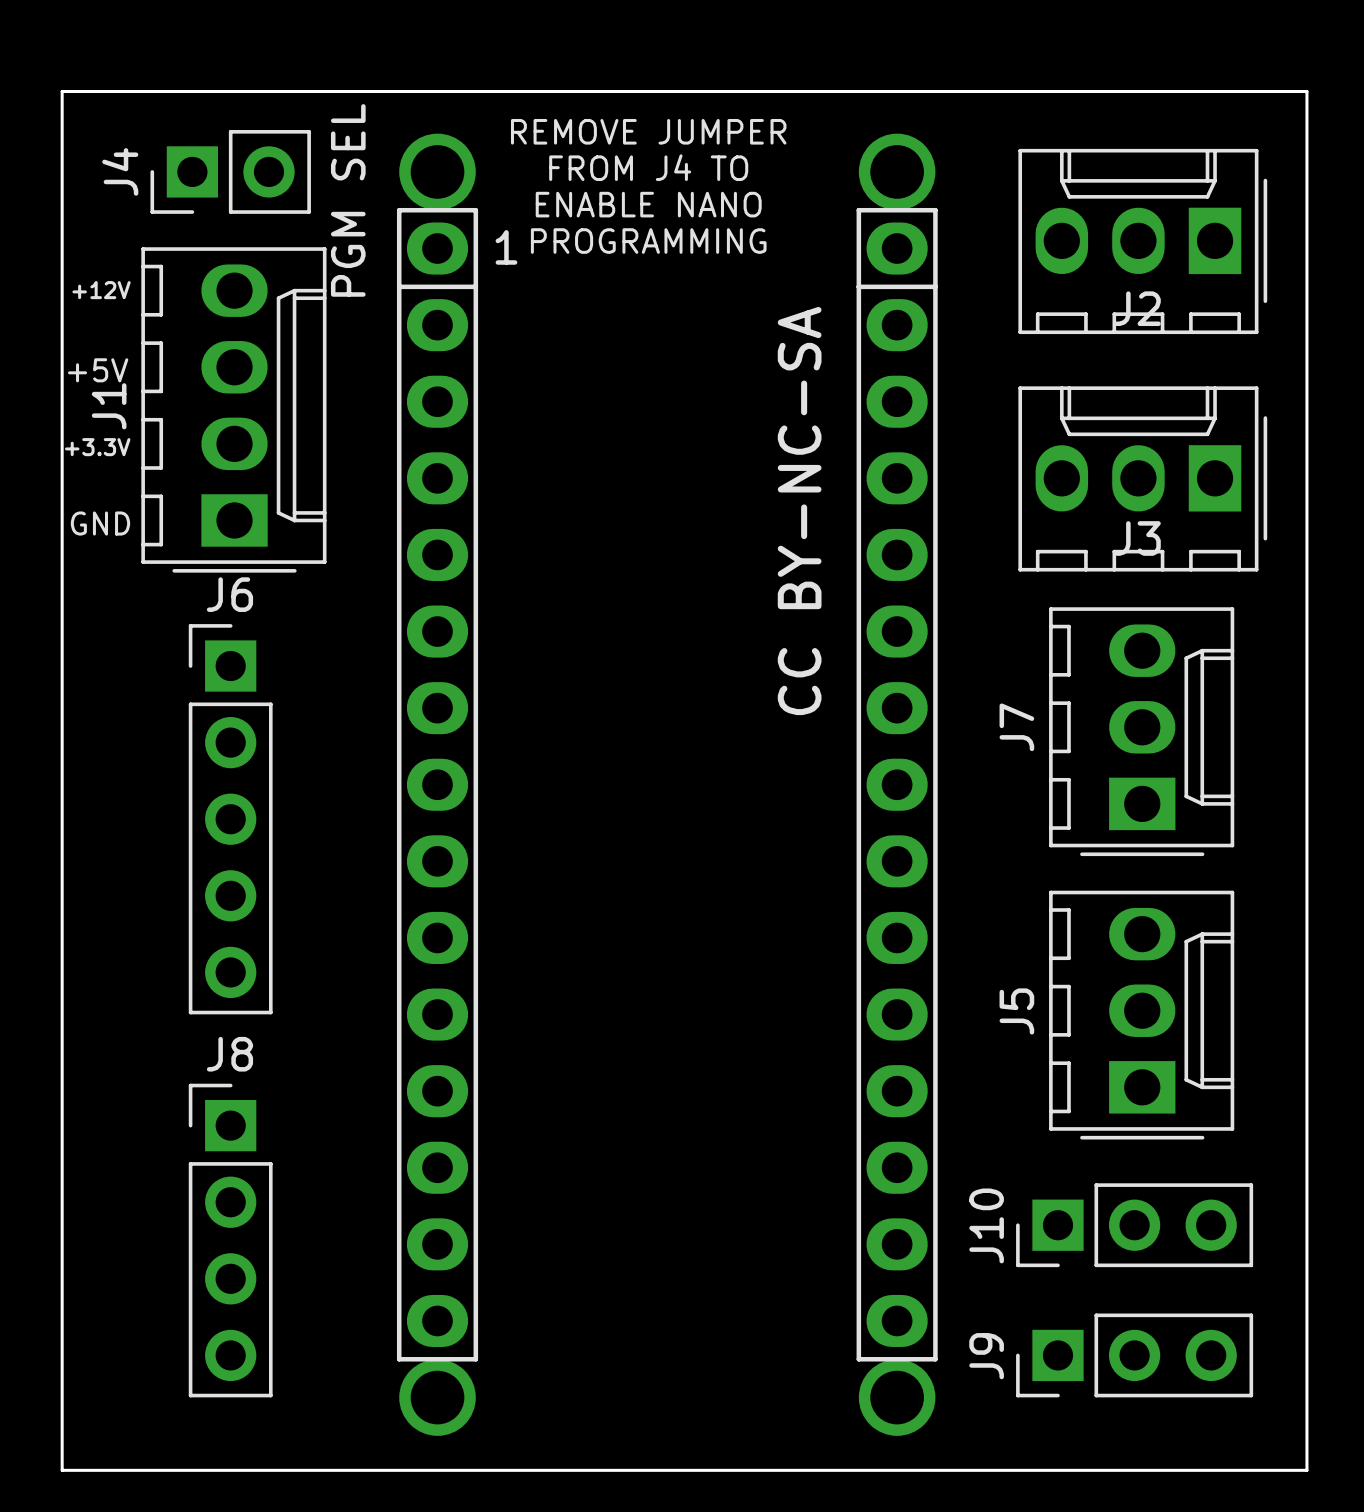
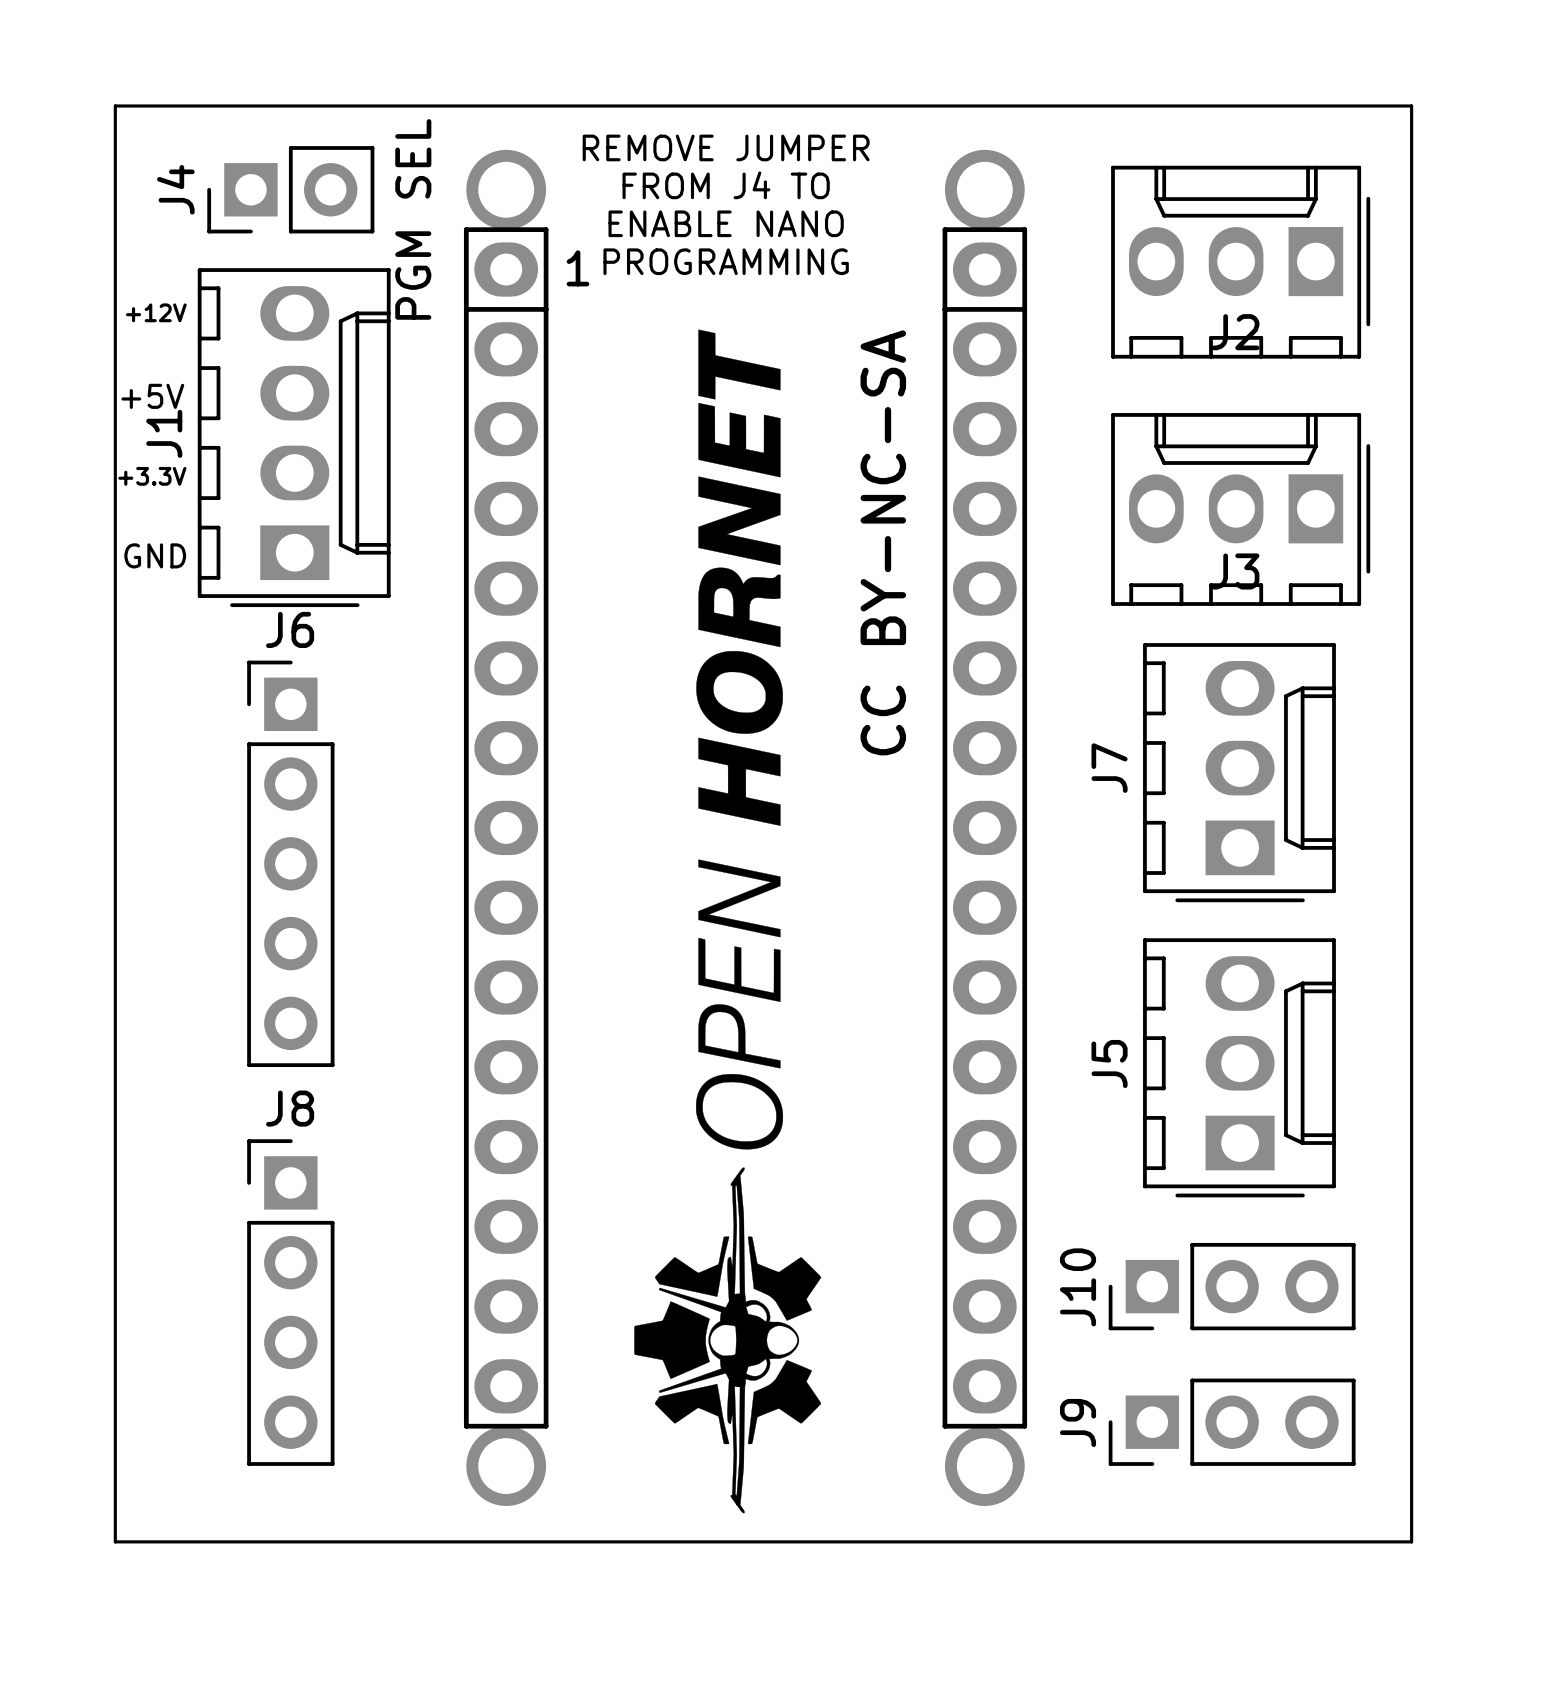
drawing: none -> [634, 329, 822, 1514]

